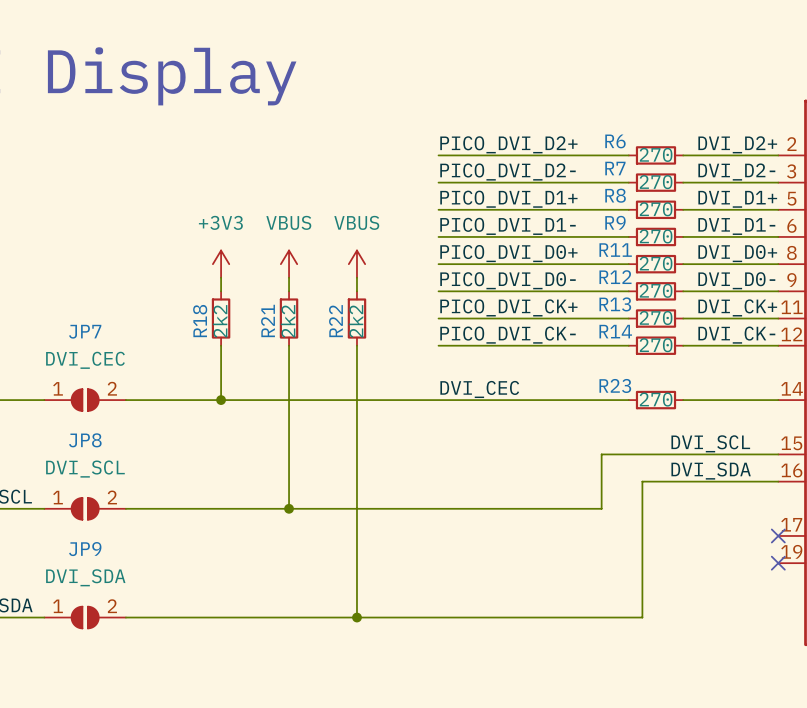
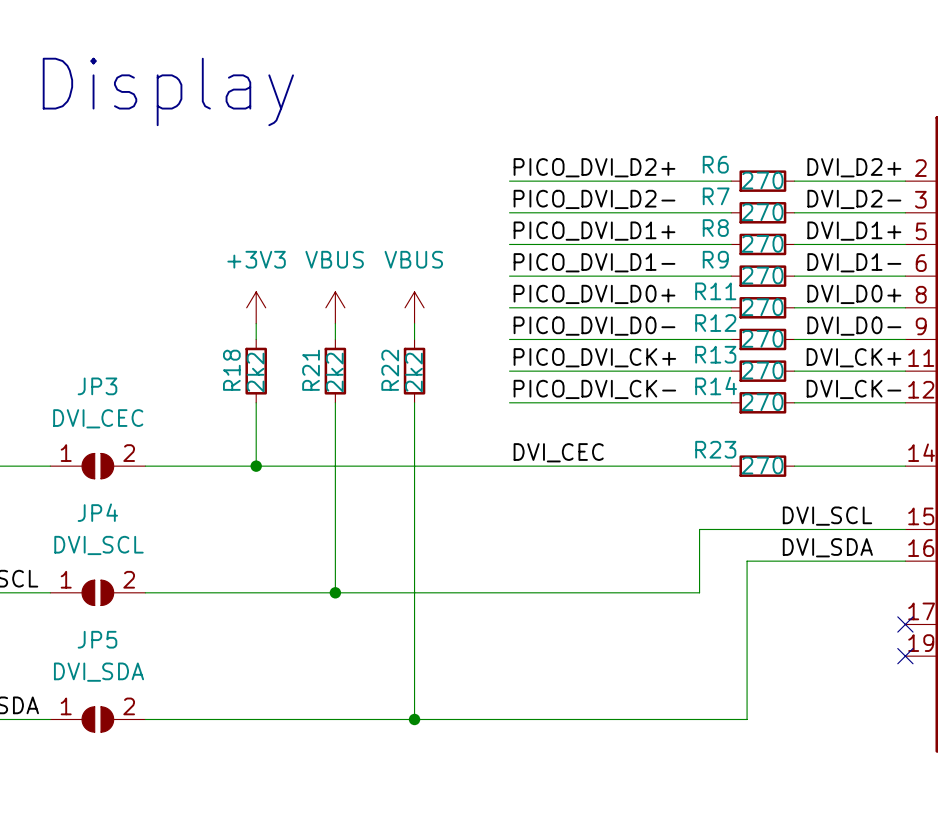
JP7 name: JP7 (85, 331) -> JP3 (97, 386)
JP8 name: JP8 (85, 440) -> JP4 (97, 512)
JP9 name: JP9 (85, 549) -> JP5 (97, 639)

